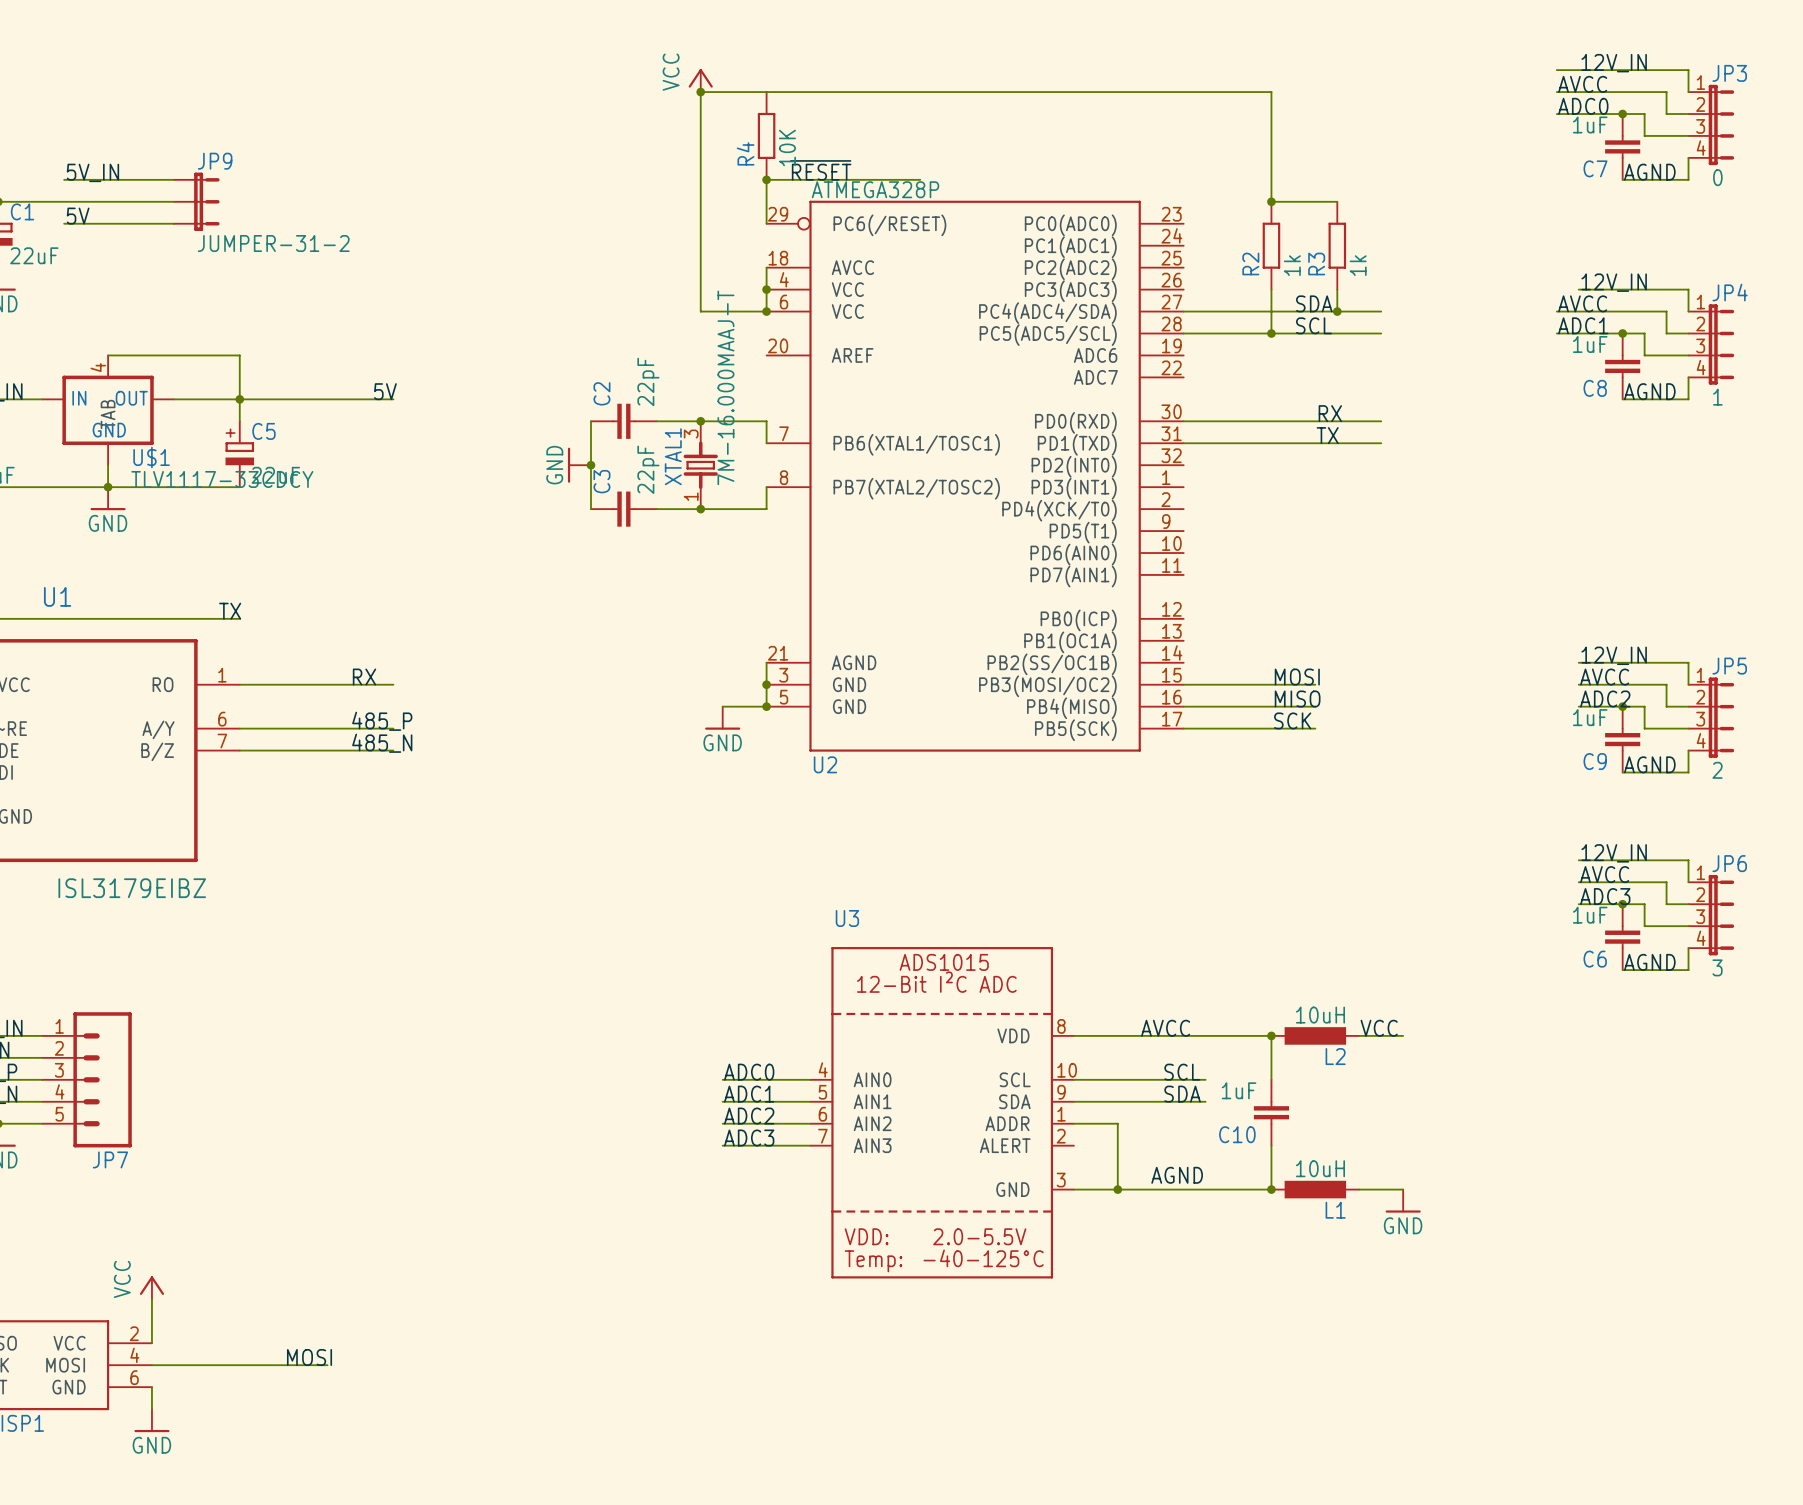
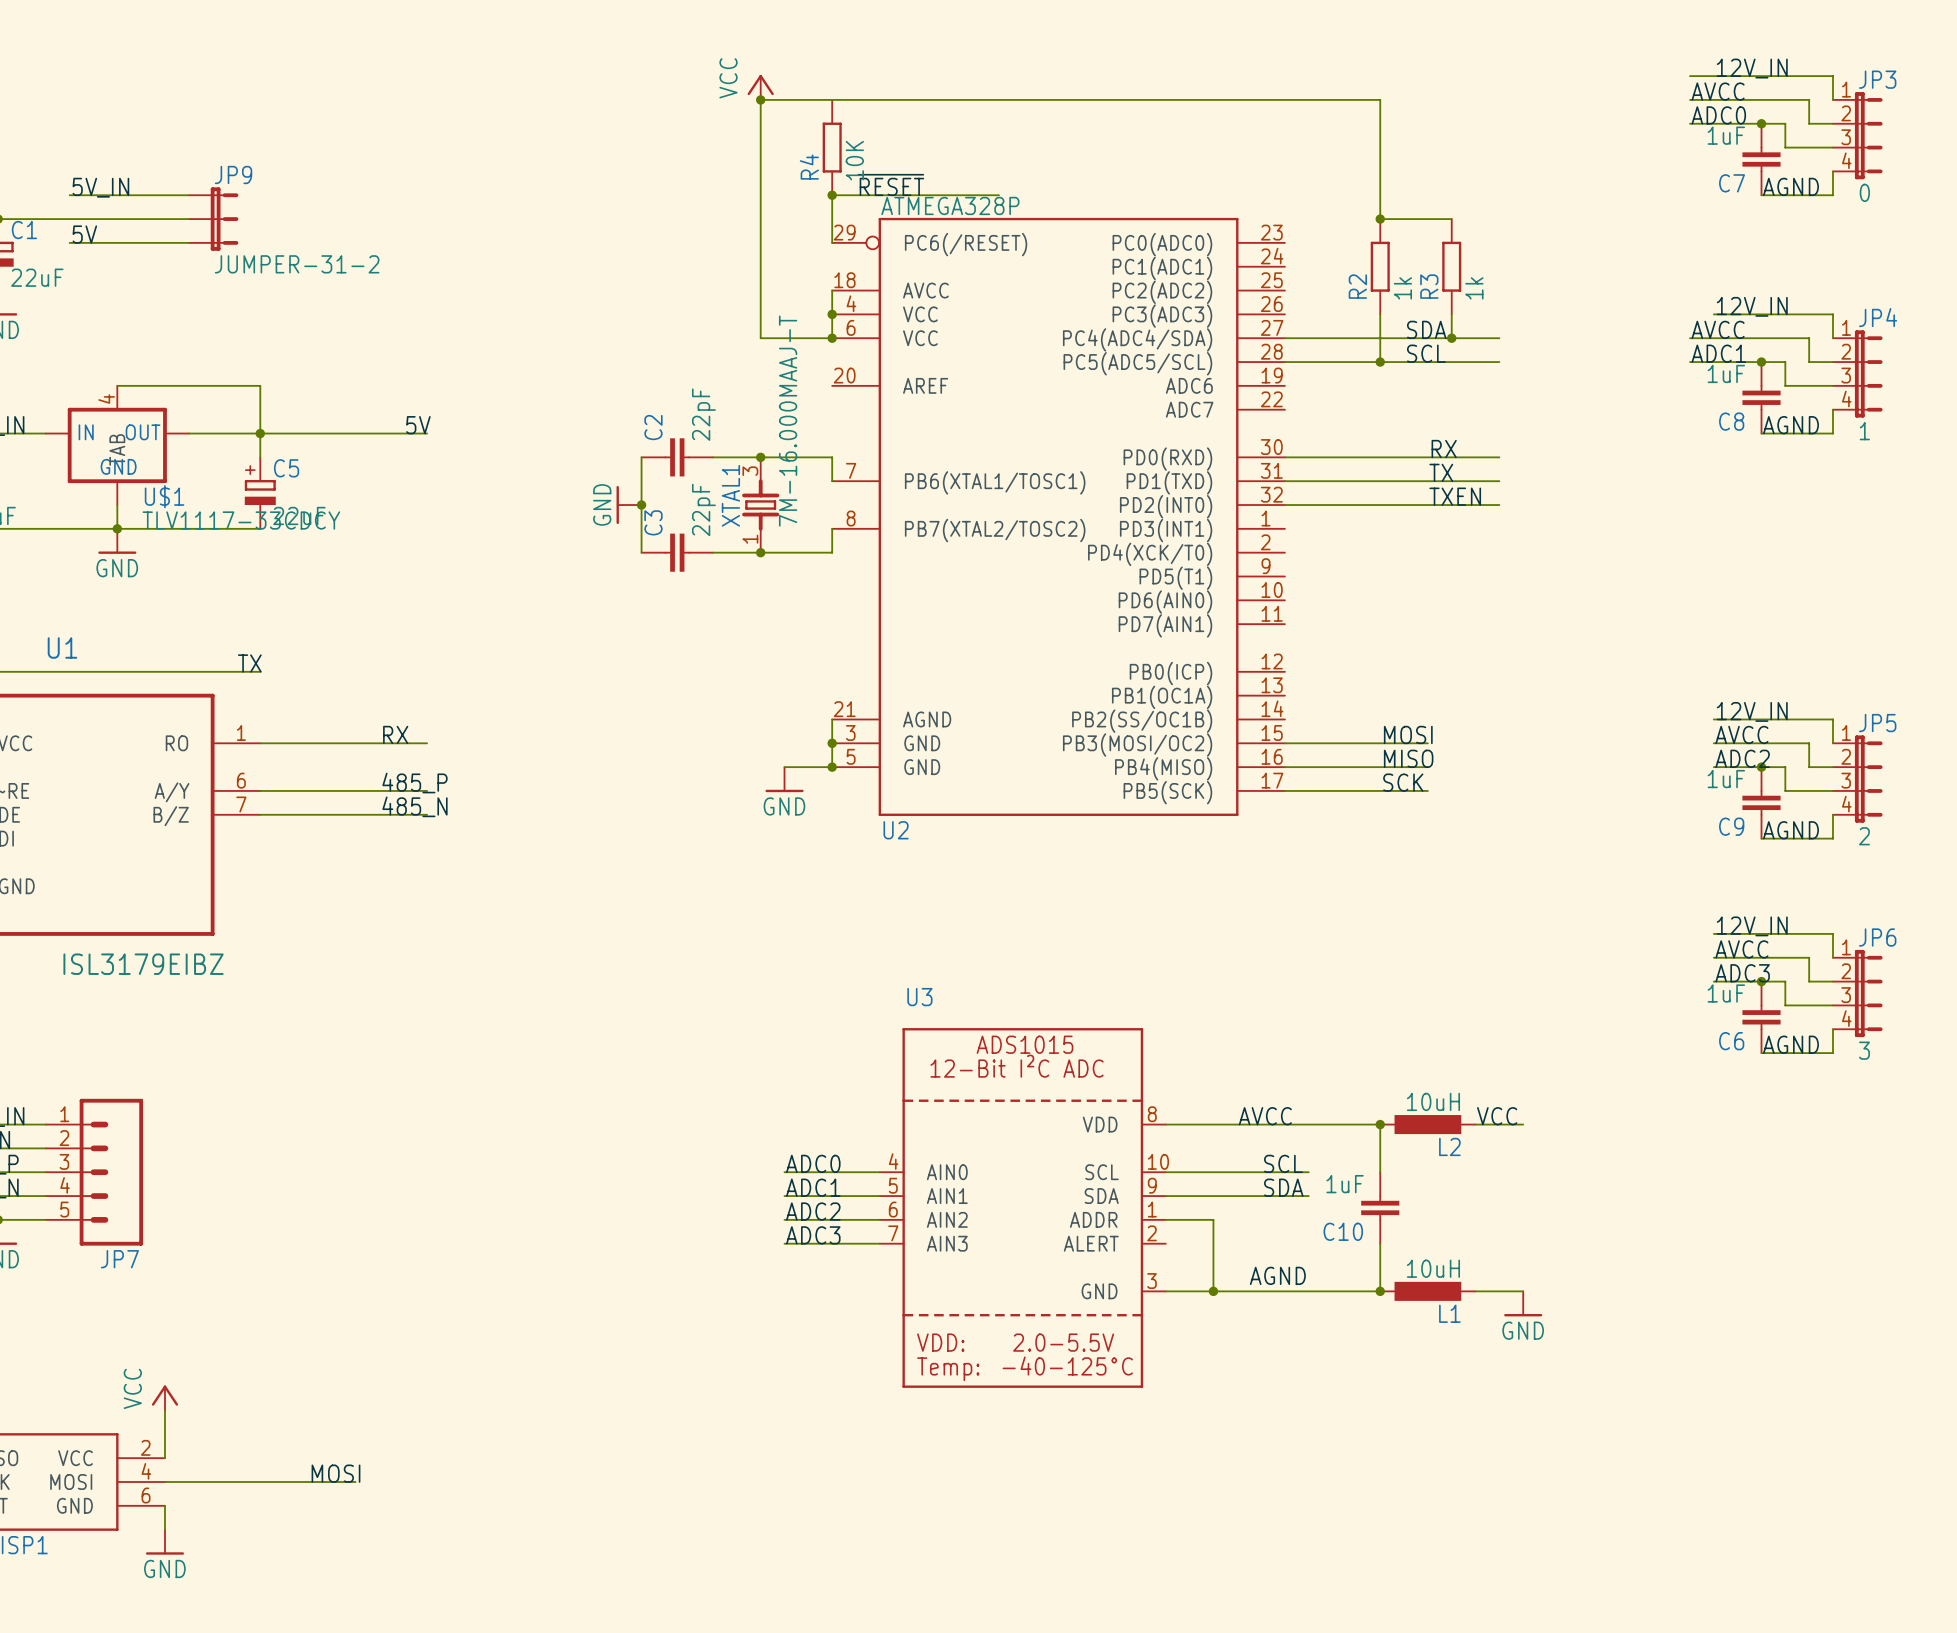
label: none -> TXEN (1455, 496)
wire: none -> (1284, 505) (1499, 505)

